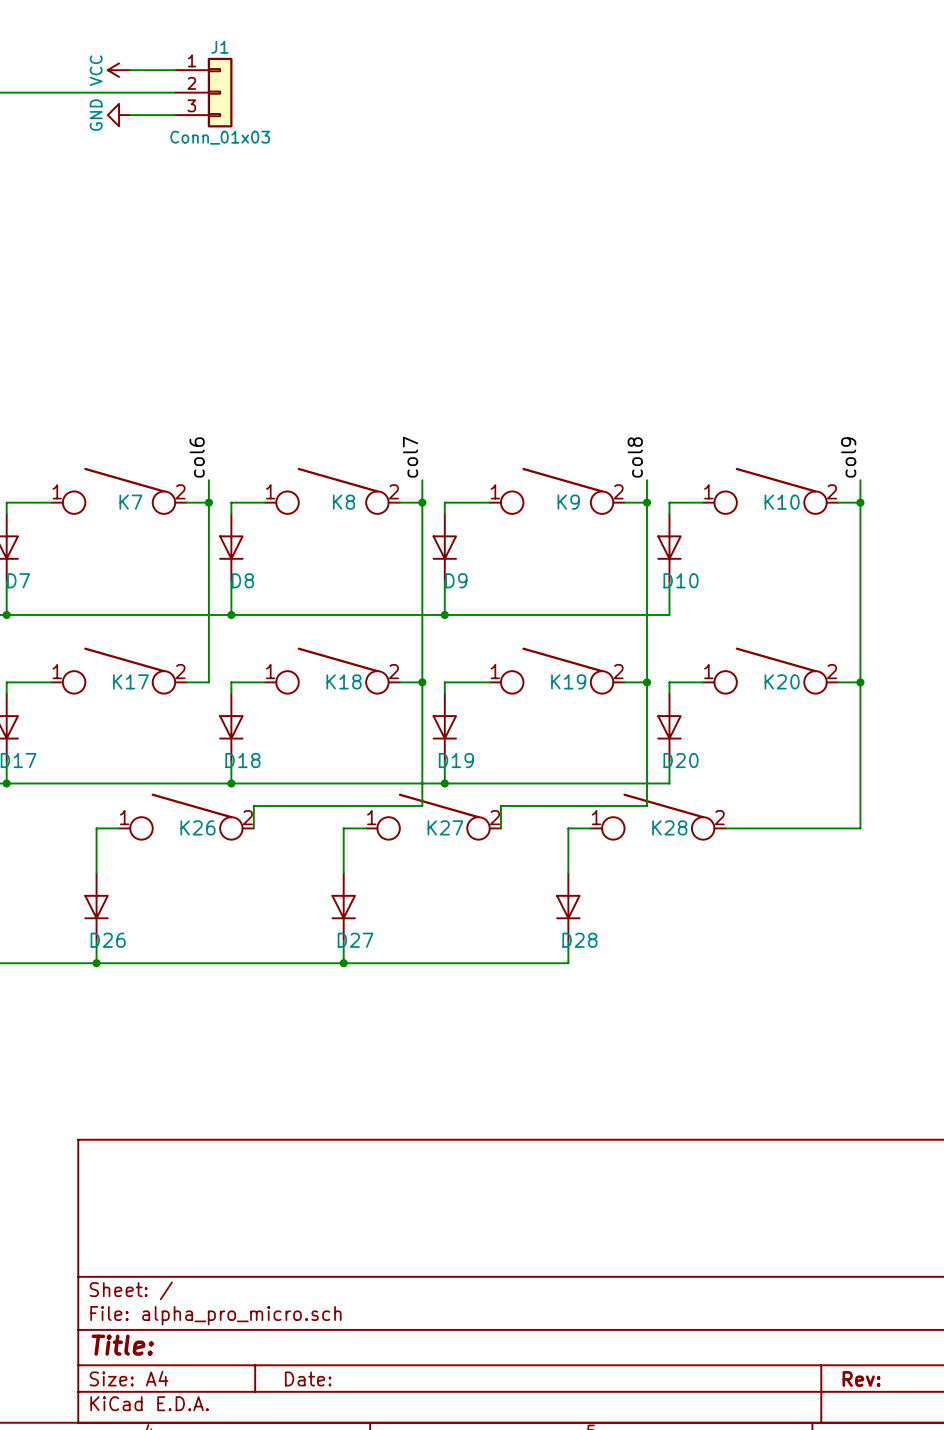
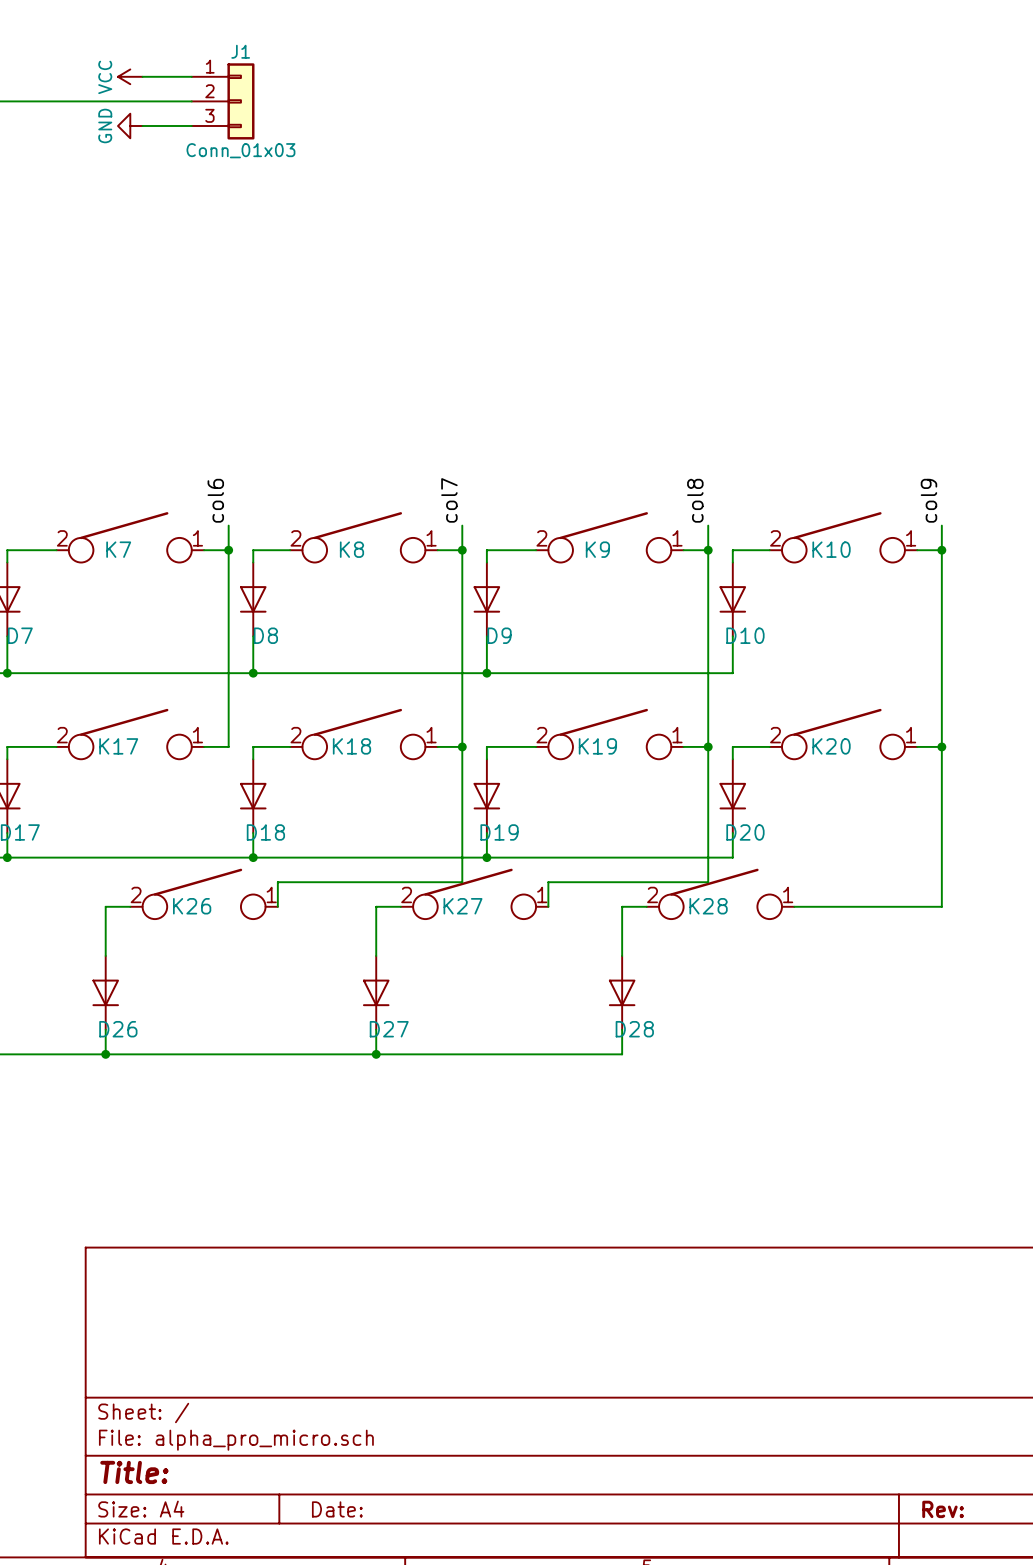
K7 flip: as is (119, 490) -> left-right (130, 537)
K8 flip: as is (332, 490) -> left-right (363, 537)
K9 flip: as is (557, 490) -> left-right (609, 537)
K10 flip: as is (770, 490) -> left-right (843, 537)
K17 flip: as is (119, 670) -> left-right (130, 734)
K18 flip: as is (332, 670) -> left-right (363, 734)
K19 flip: as is (557, 670) -> left-right (609, 734)
K20 flip: as is (770, 670) -> left-right (843, 734)
K26 flip: as is (186, 816) -> left-right (204, 893)
K27 flip: as is (433, 816) -> left-right (474, 893)
K28 flip: as is (658, 816) -> left-right (720, 893)

